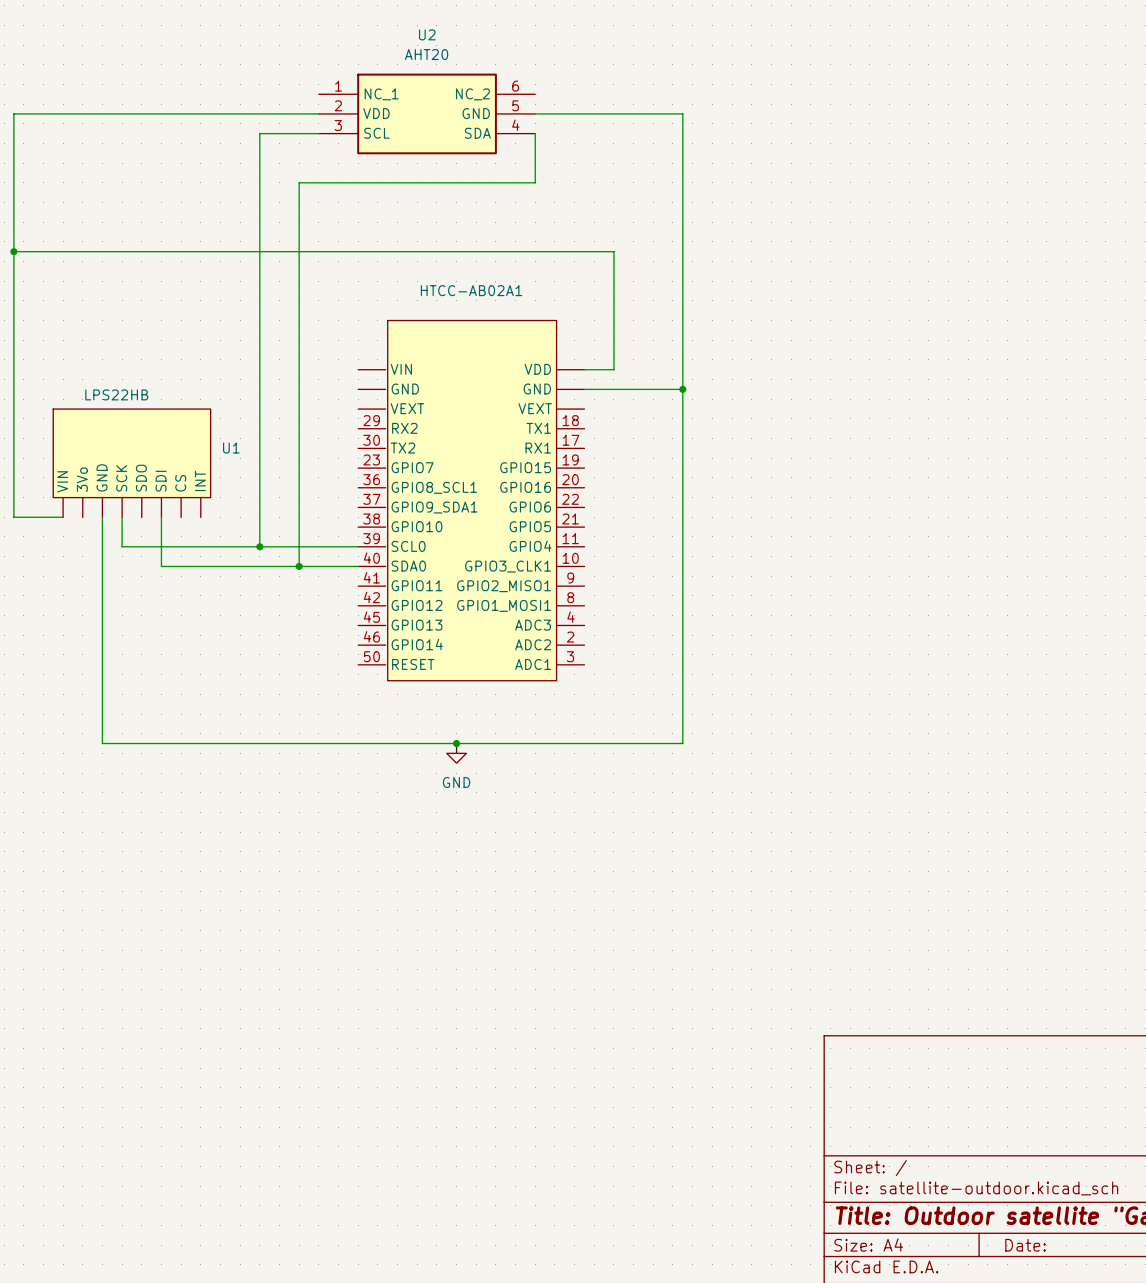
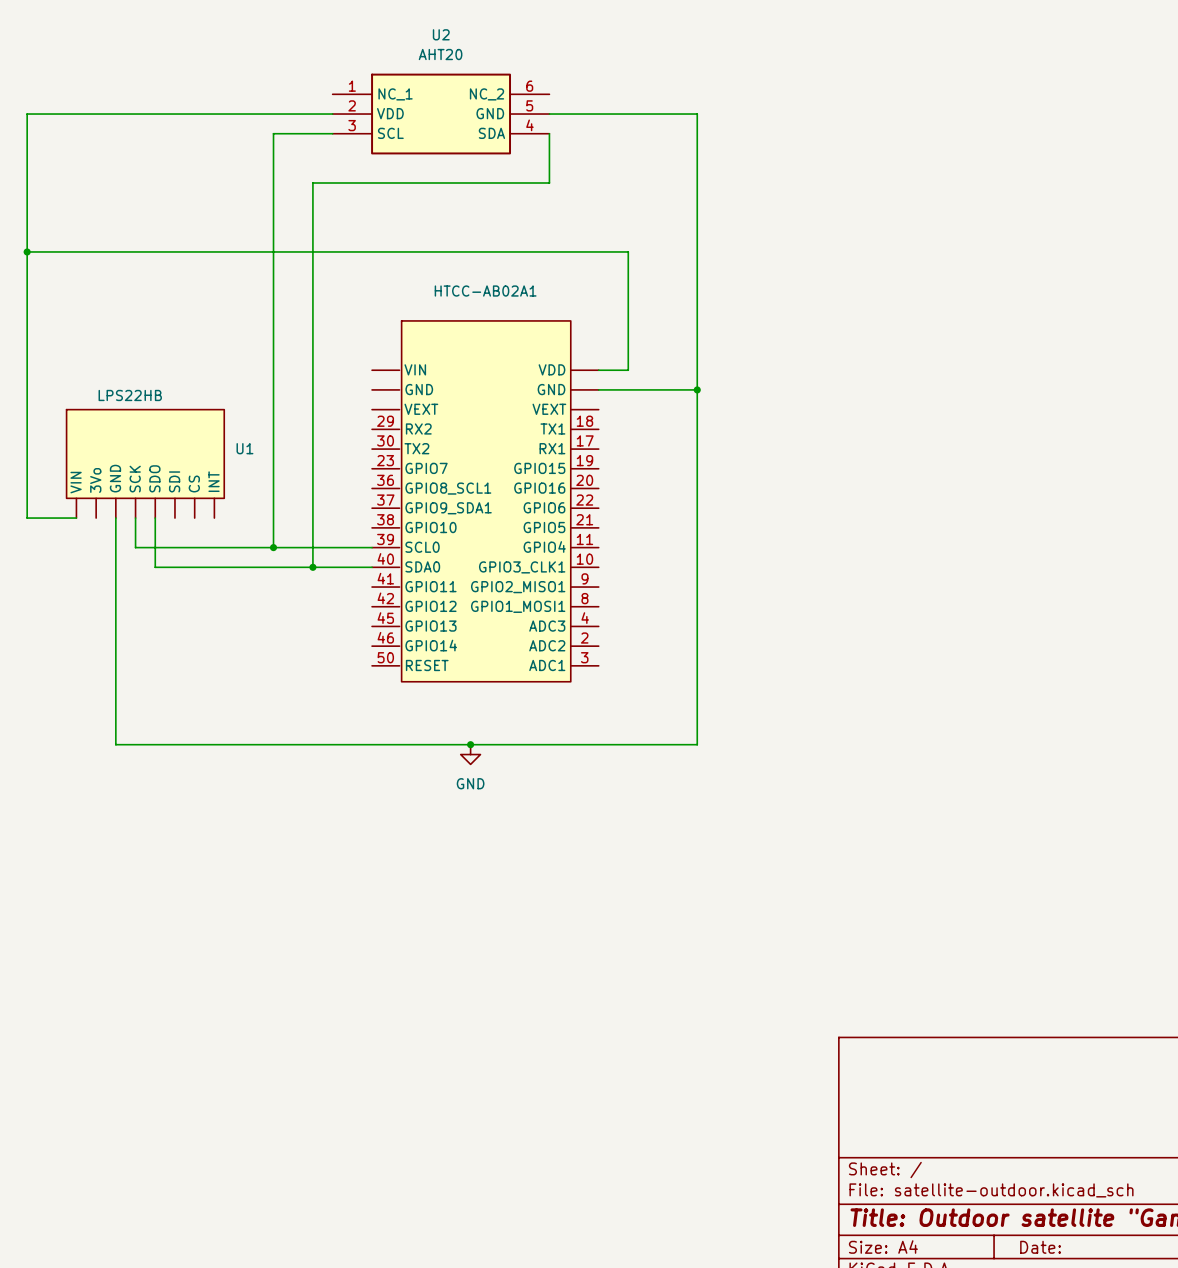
wire: (161, 517) (161, 566) -> (155, 518) (155, 567) (174, 567)

